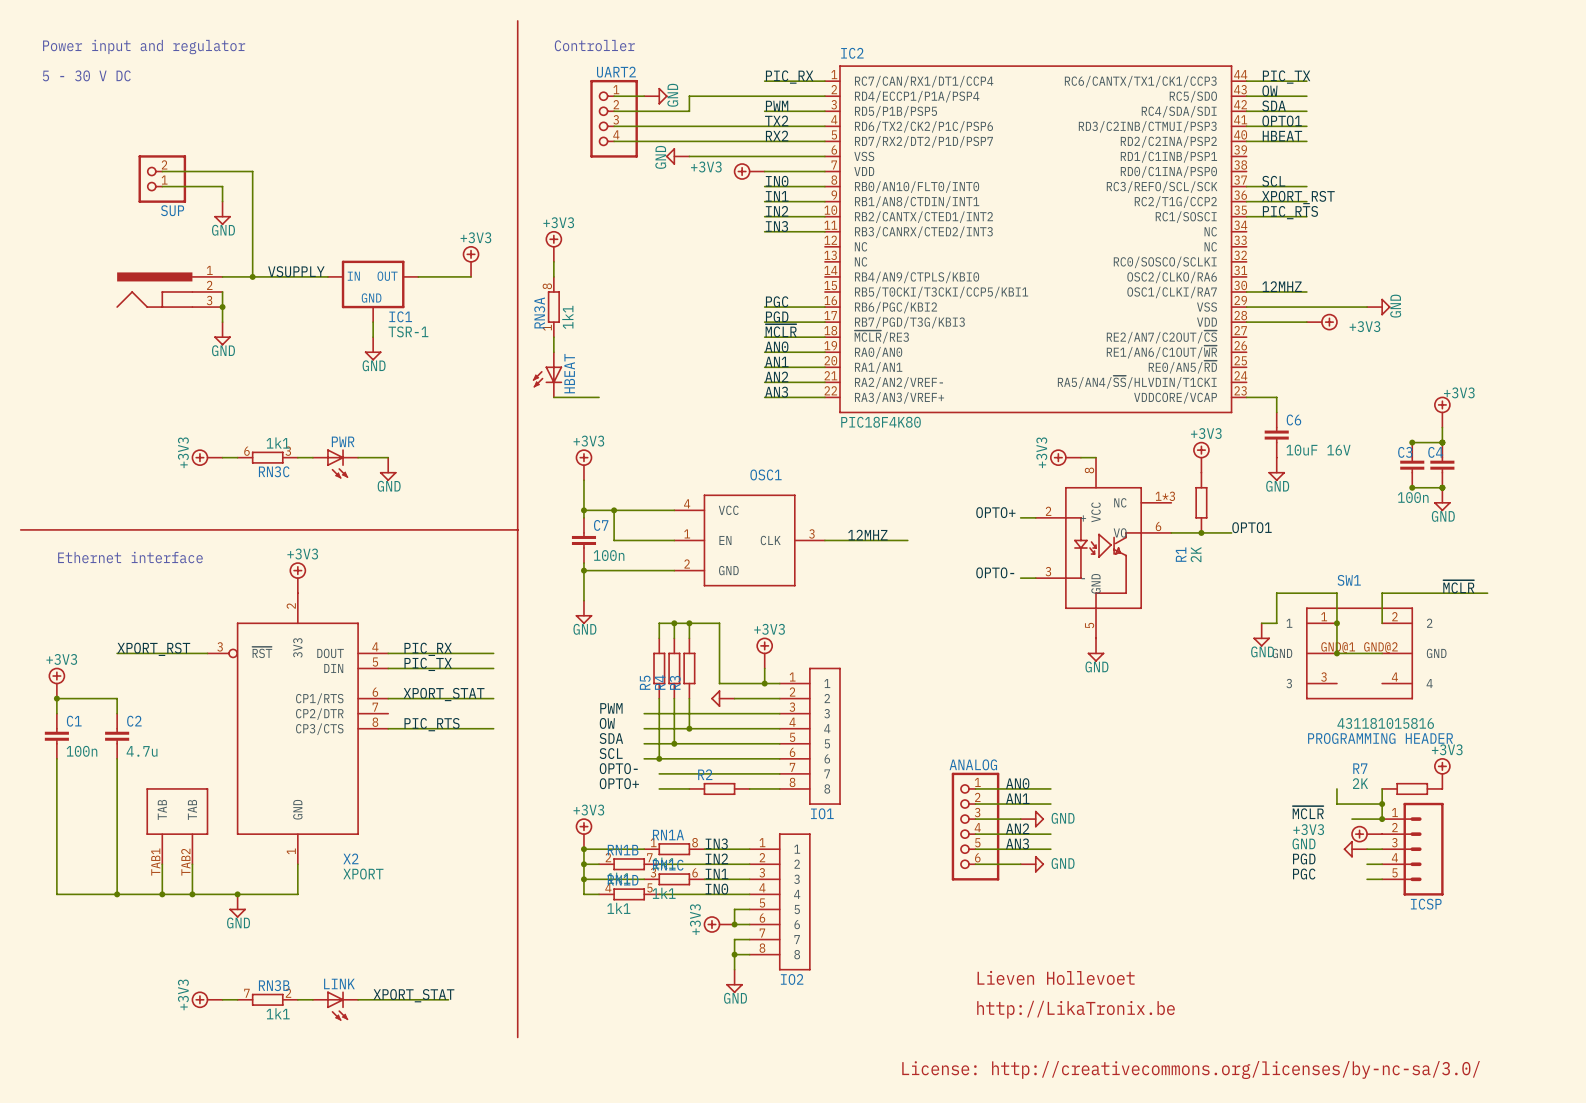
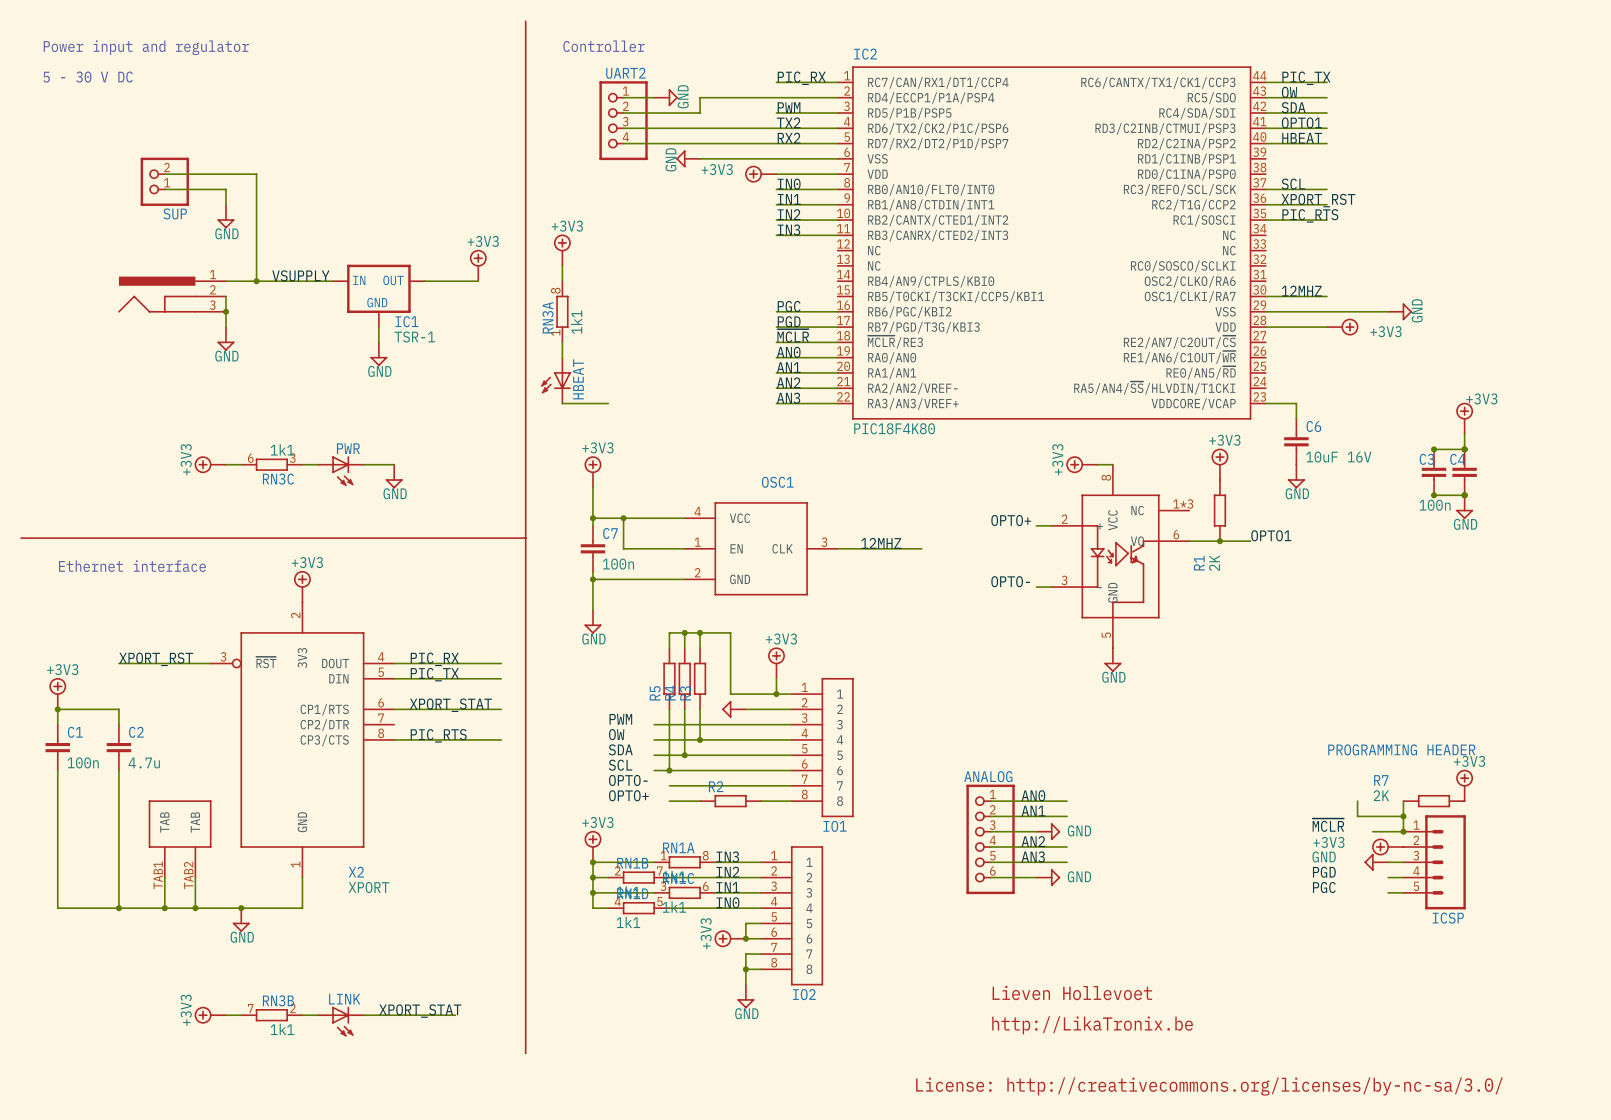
label: ~{MCLR} (1458, 586) -> none
wire: (1487, 593) (1382, 593) (1382, 623) -> none
wire: (1261, 623) (1276, 623) (1276, 593) (1336, 593) (1336, 653) (1382, 653) -> none
junction: (1336, 623) -> none
power symbol: GND (1261, 634) -> none
junction: (1336, 653) -> none
SW1: 431181015816 (1359, 653) -> none

